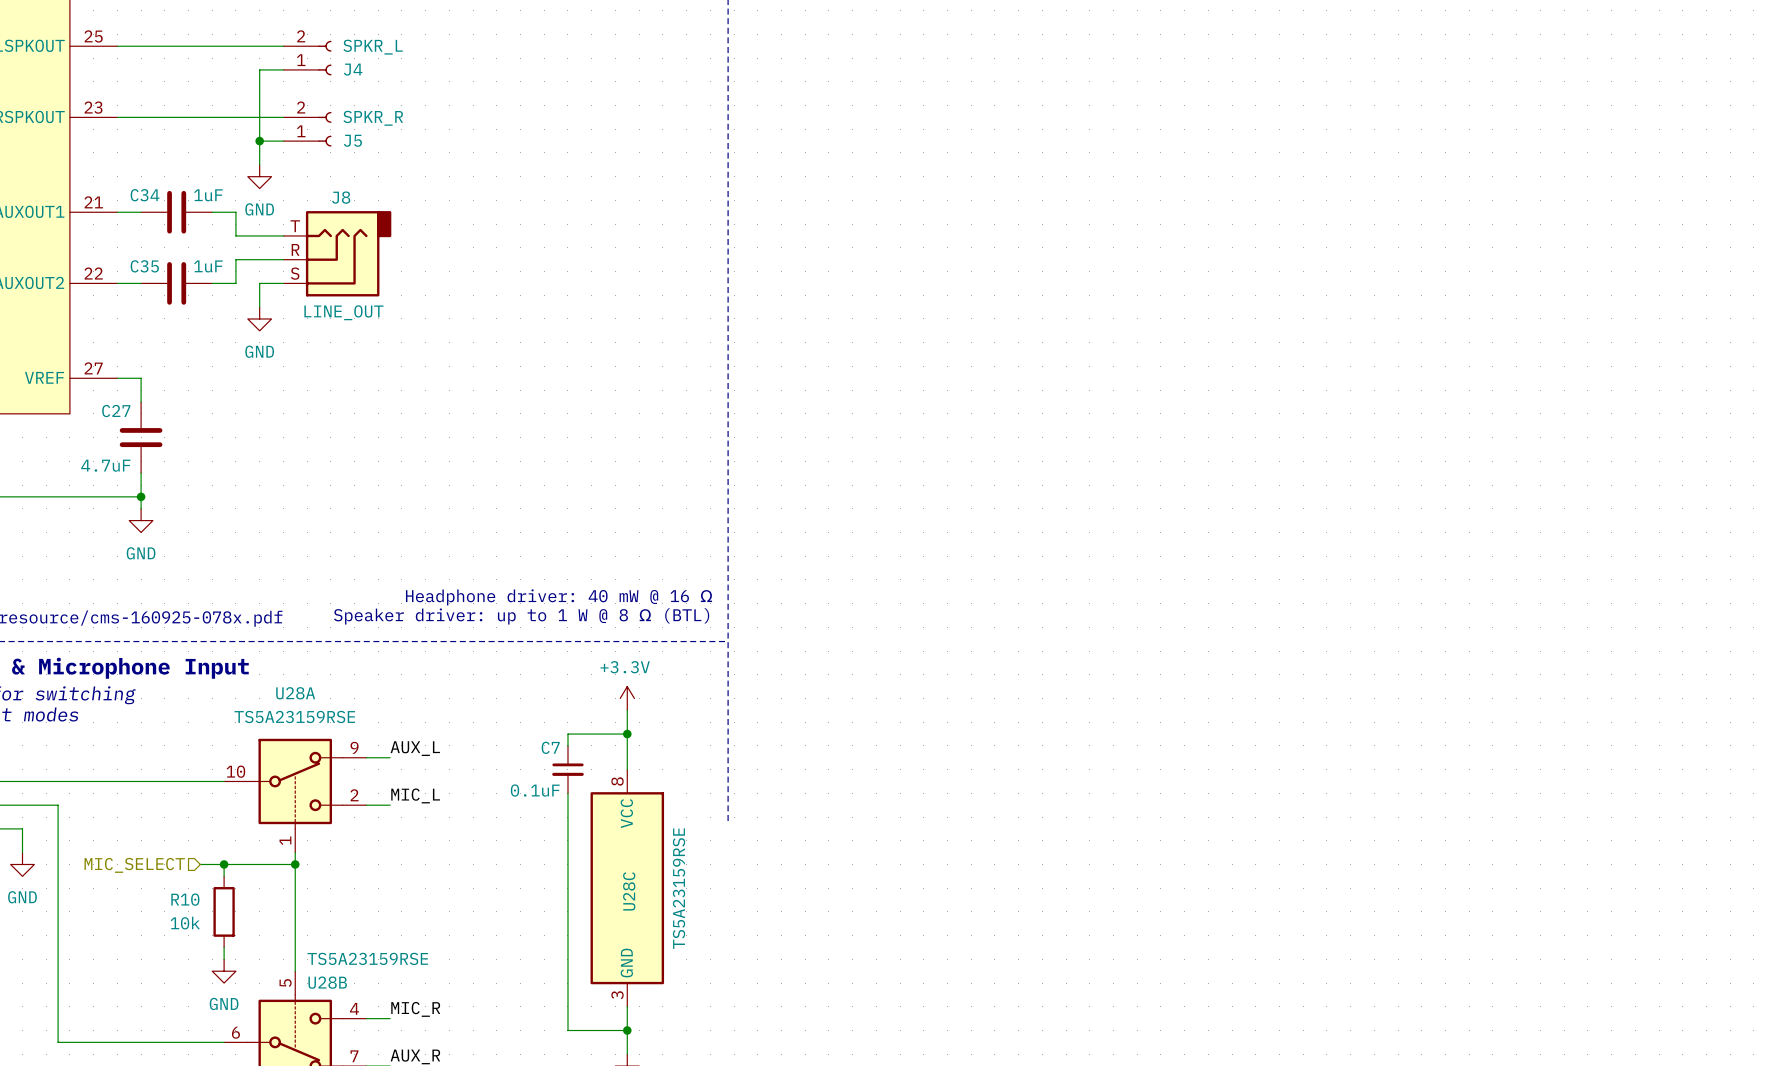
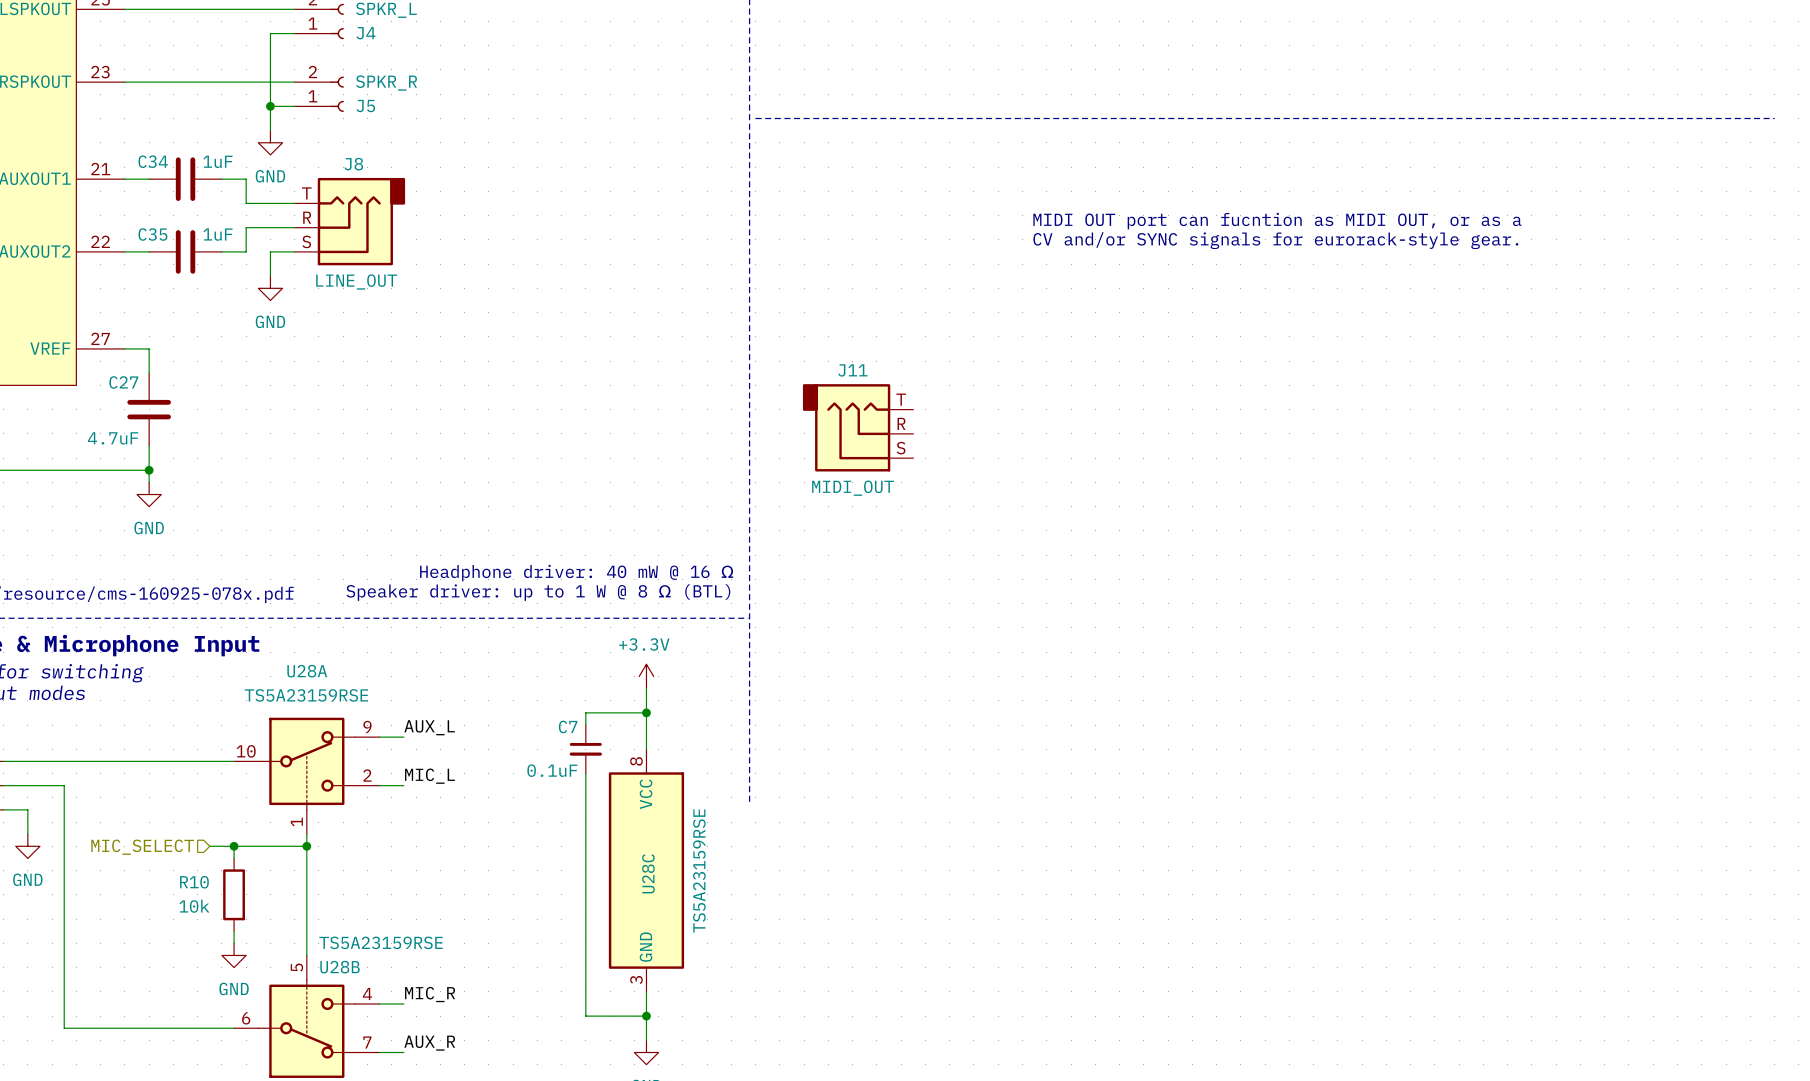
line: none -> (755, 118) (1774, 118)
text: none -> MIDI OUT port can fucntion as MIDI OUT, or as a (1277, 221)
text: none -> CV and/or SYNC signals for eurorack-style gear. (1275, 240)
J11: none -> MIDI_OUT (858, 427)

